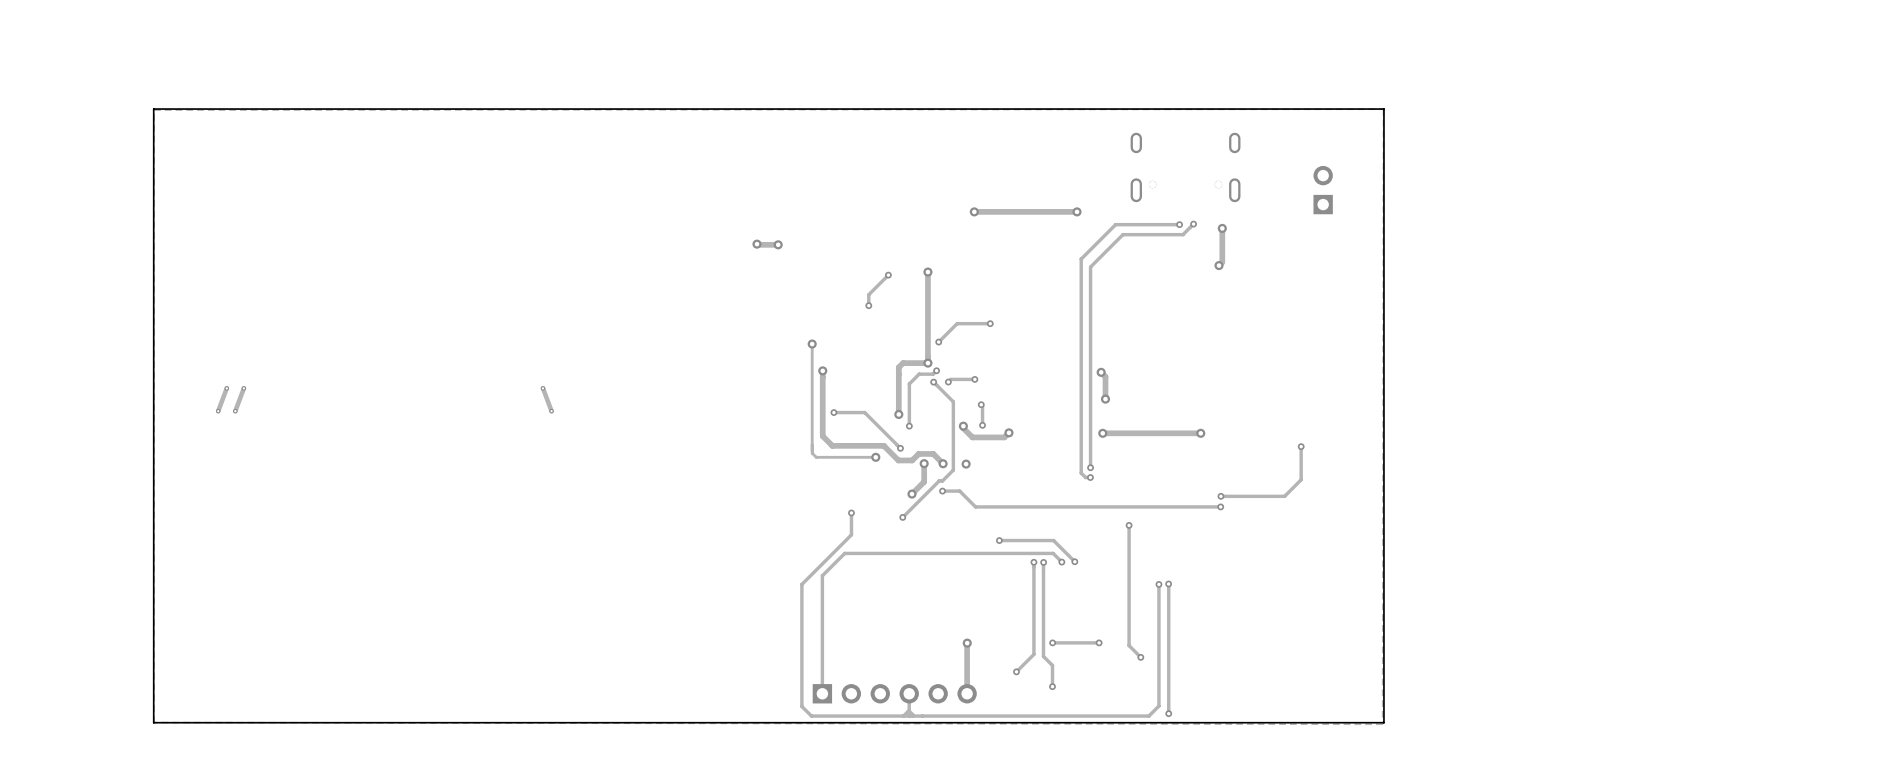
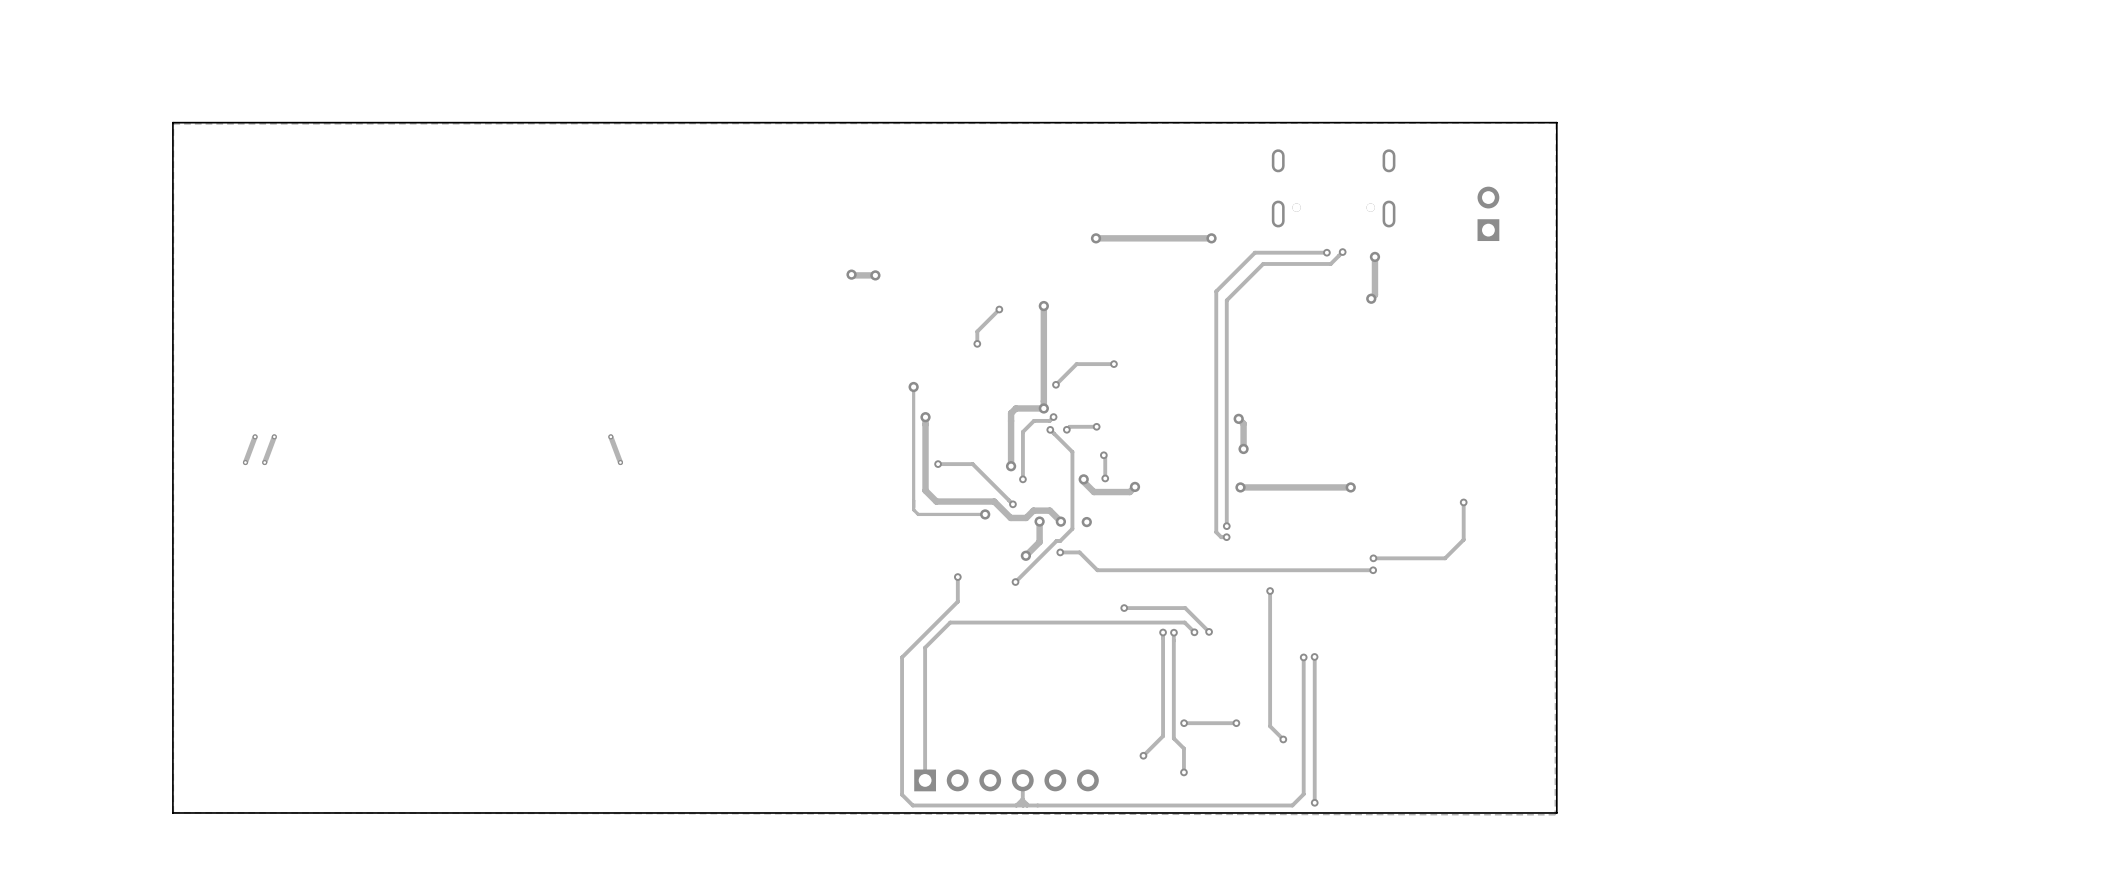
track: (967, 643) (967, 693) -> none
via: (967, 643) -> none

